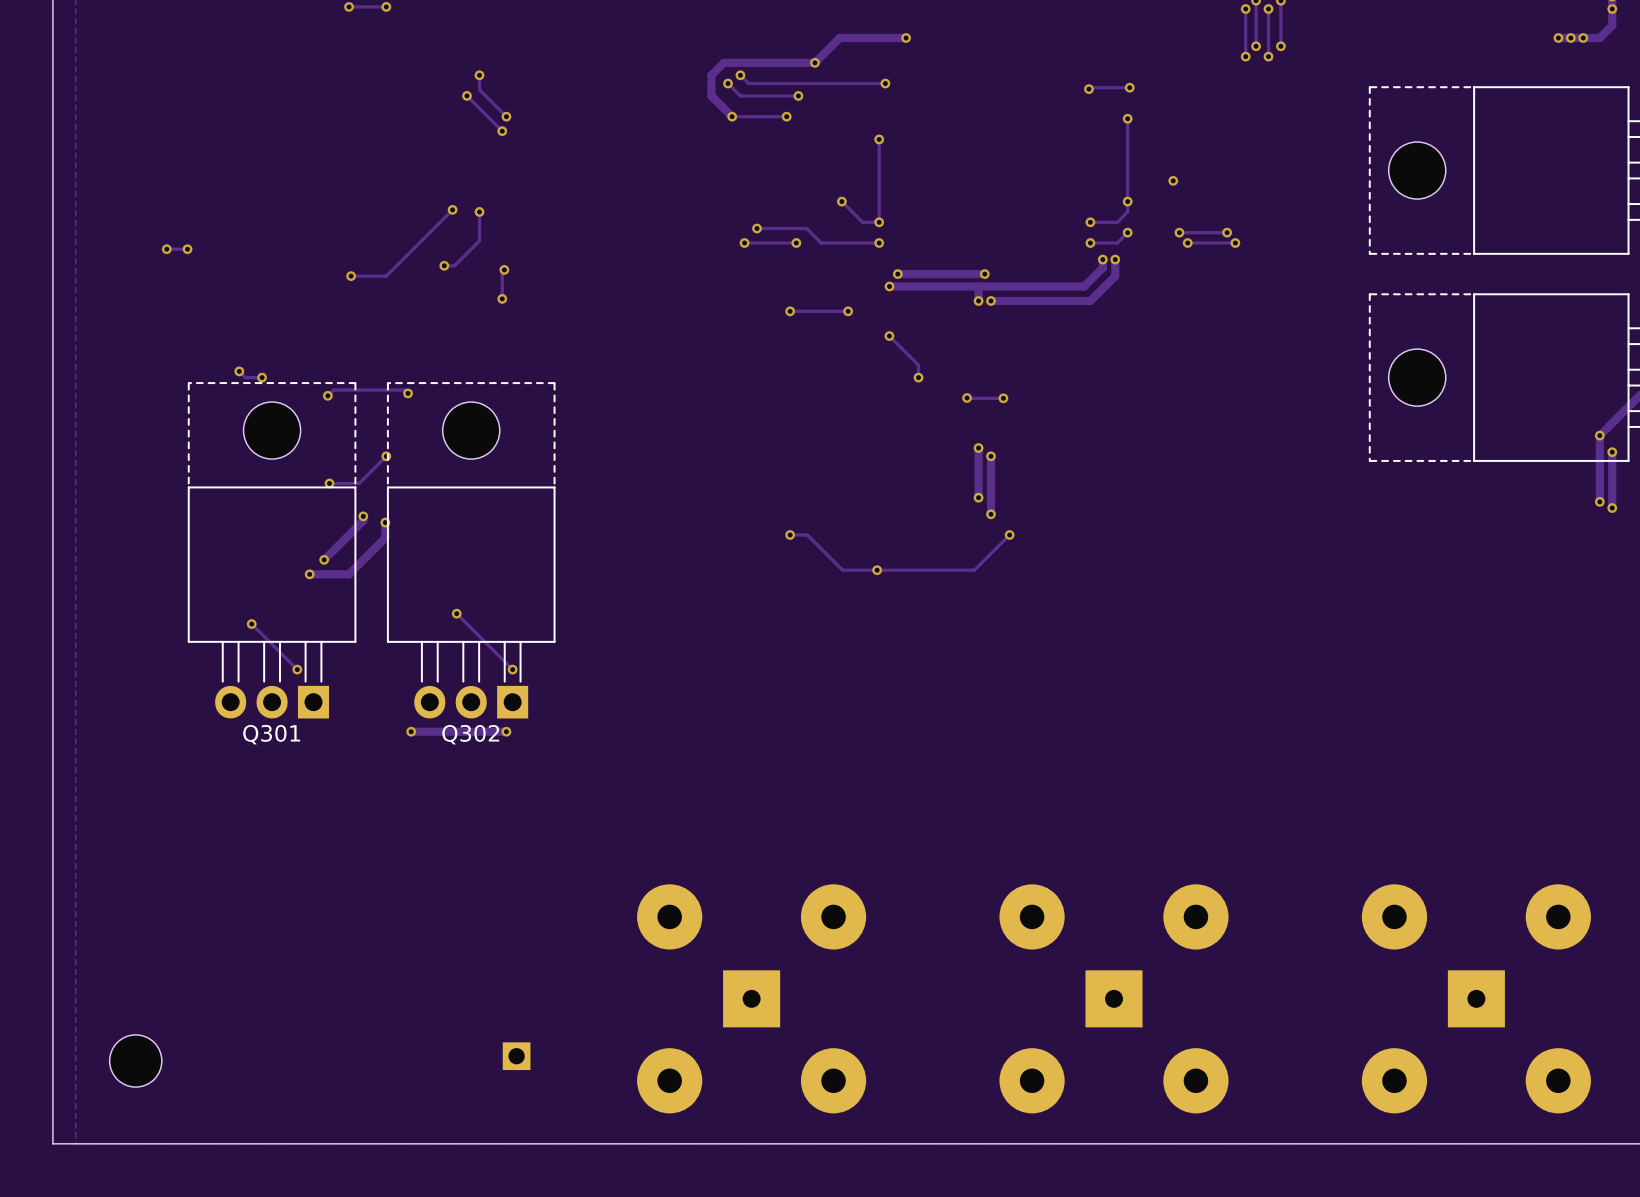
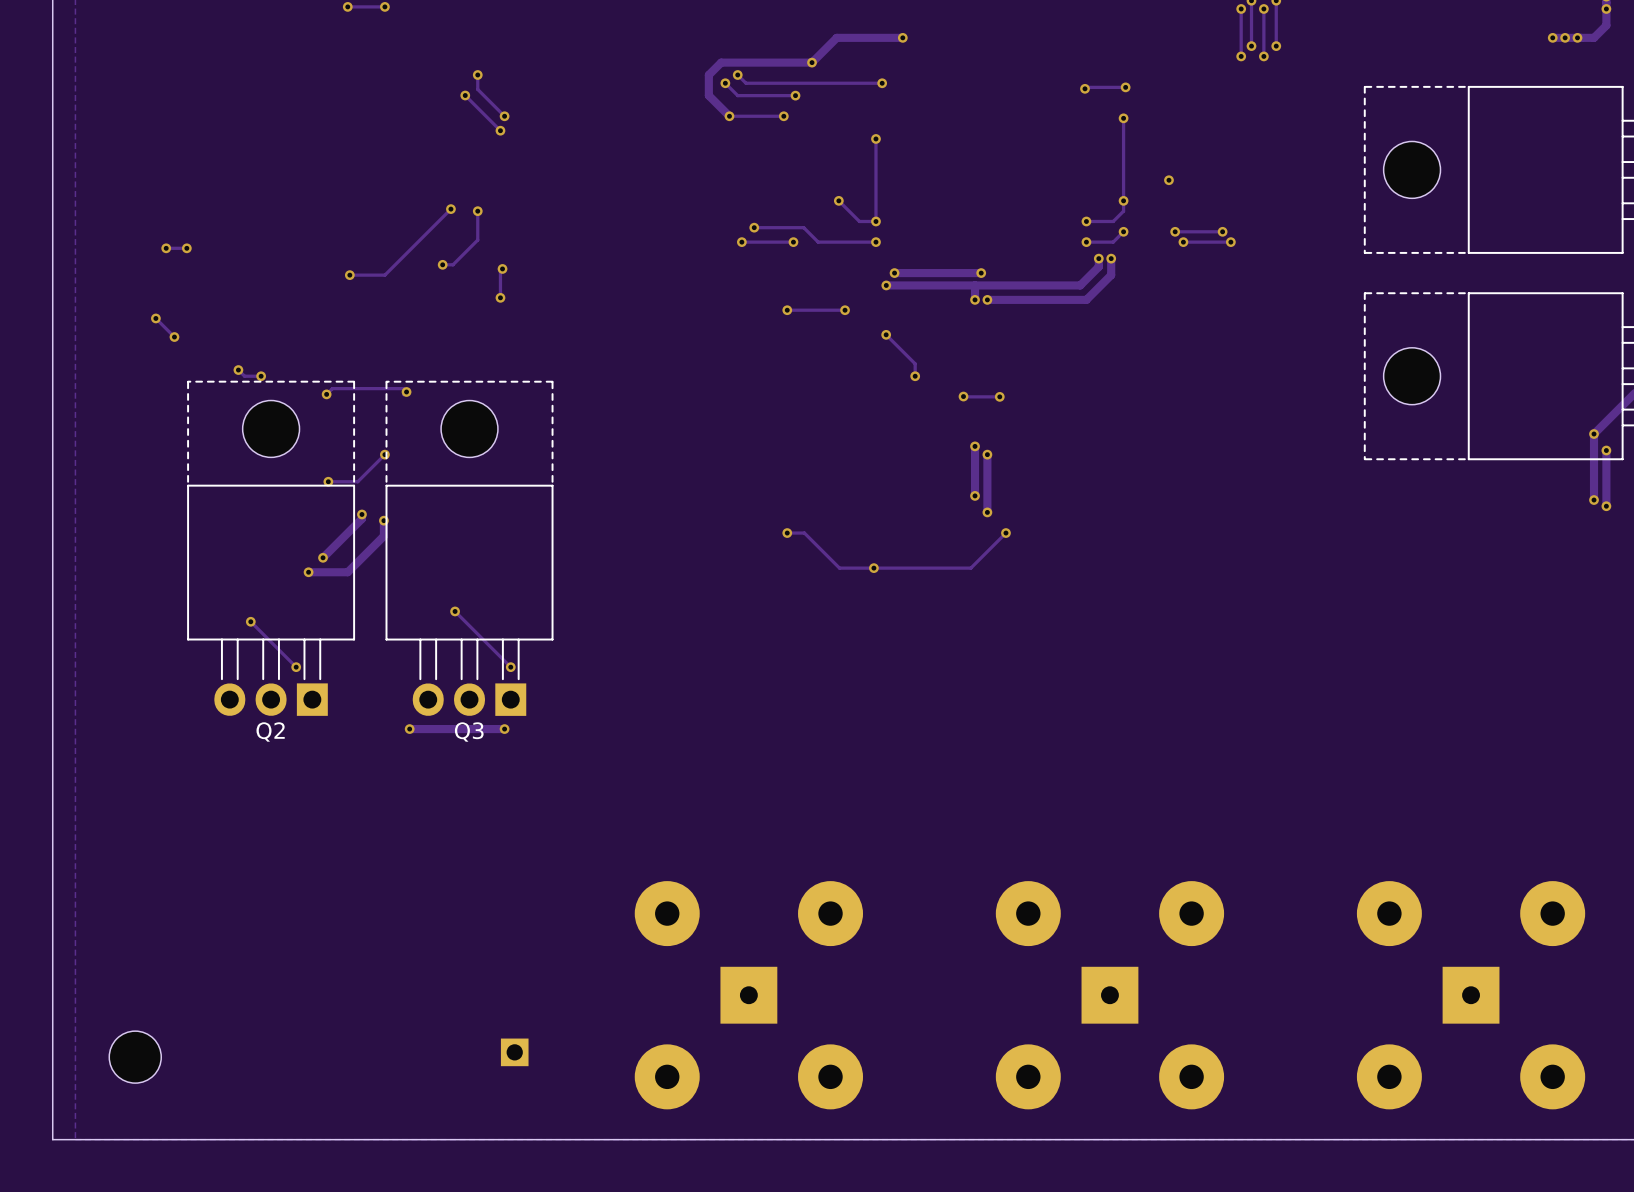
track: none -> (155, 318) (174, 337)
via: none -> (155, 318)
via: none -> (174, 337)
Q301 name: Q301 (271, 734) -> Q2 (270, 731)
Q302 name: Q302 (470, 734) -> Q3 (469, 732)

